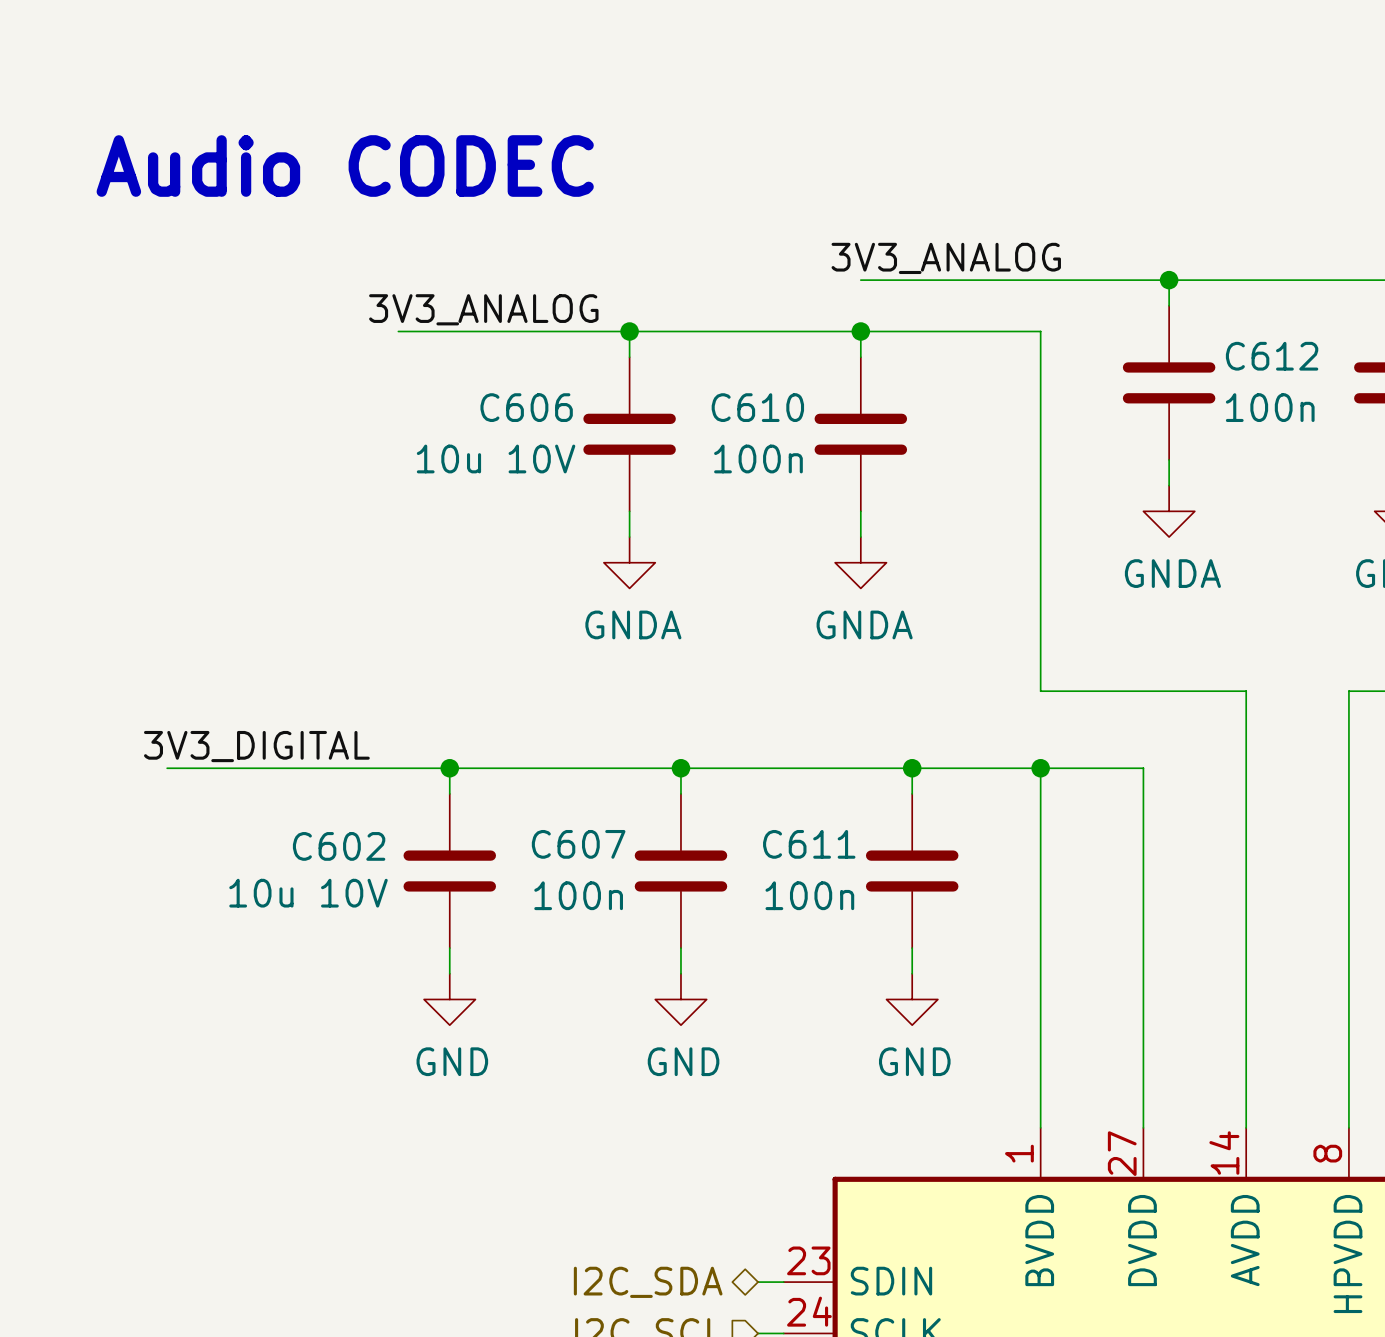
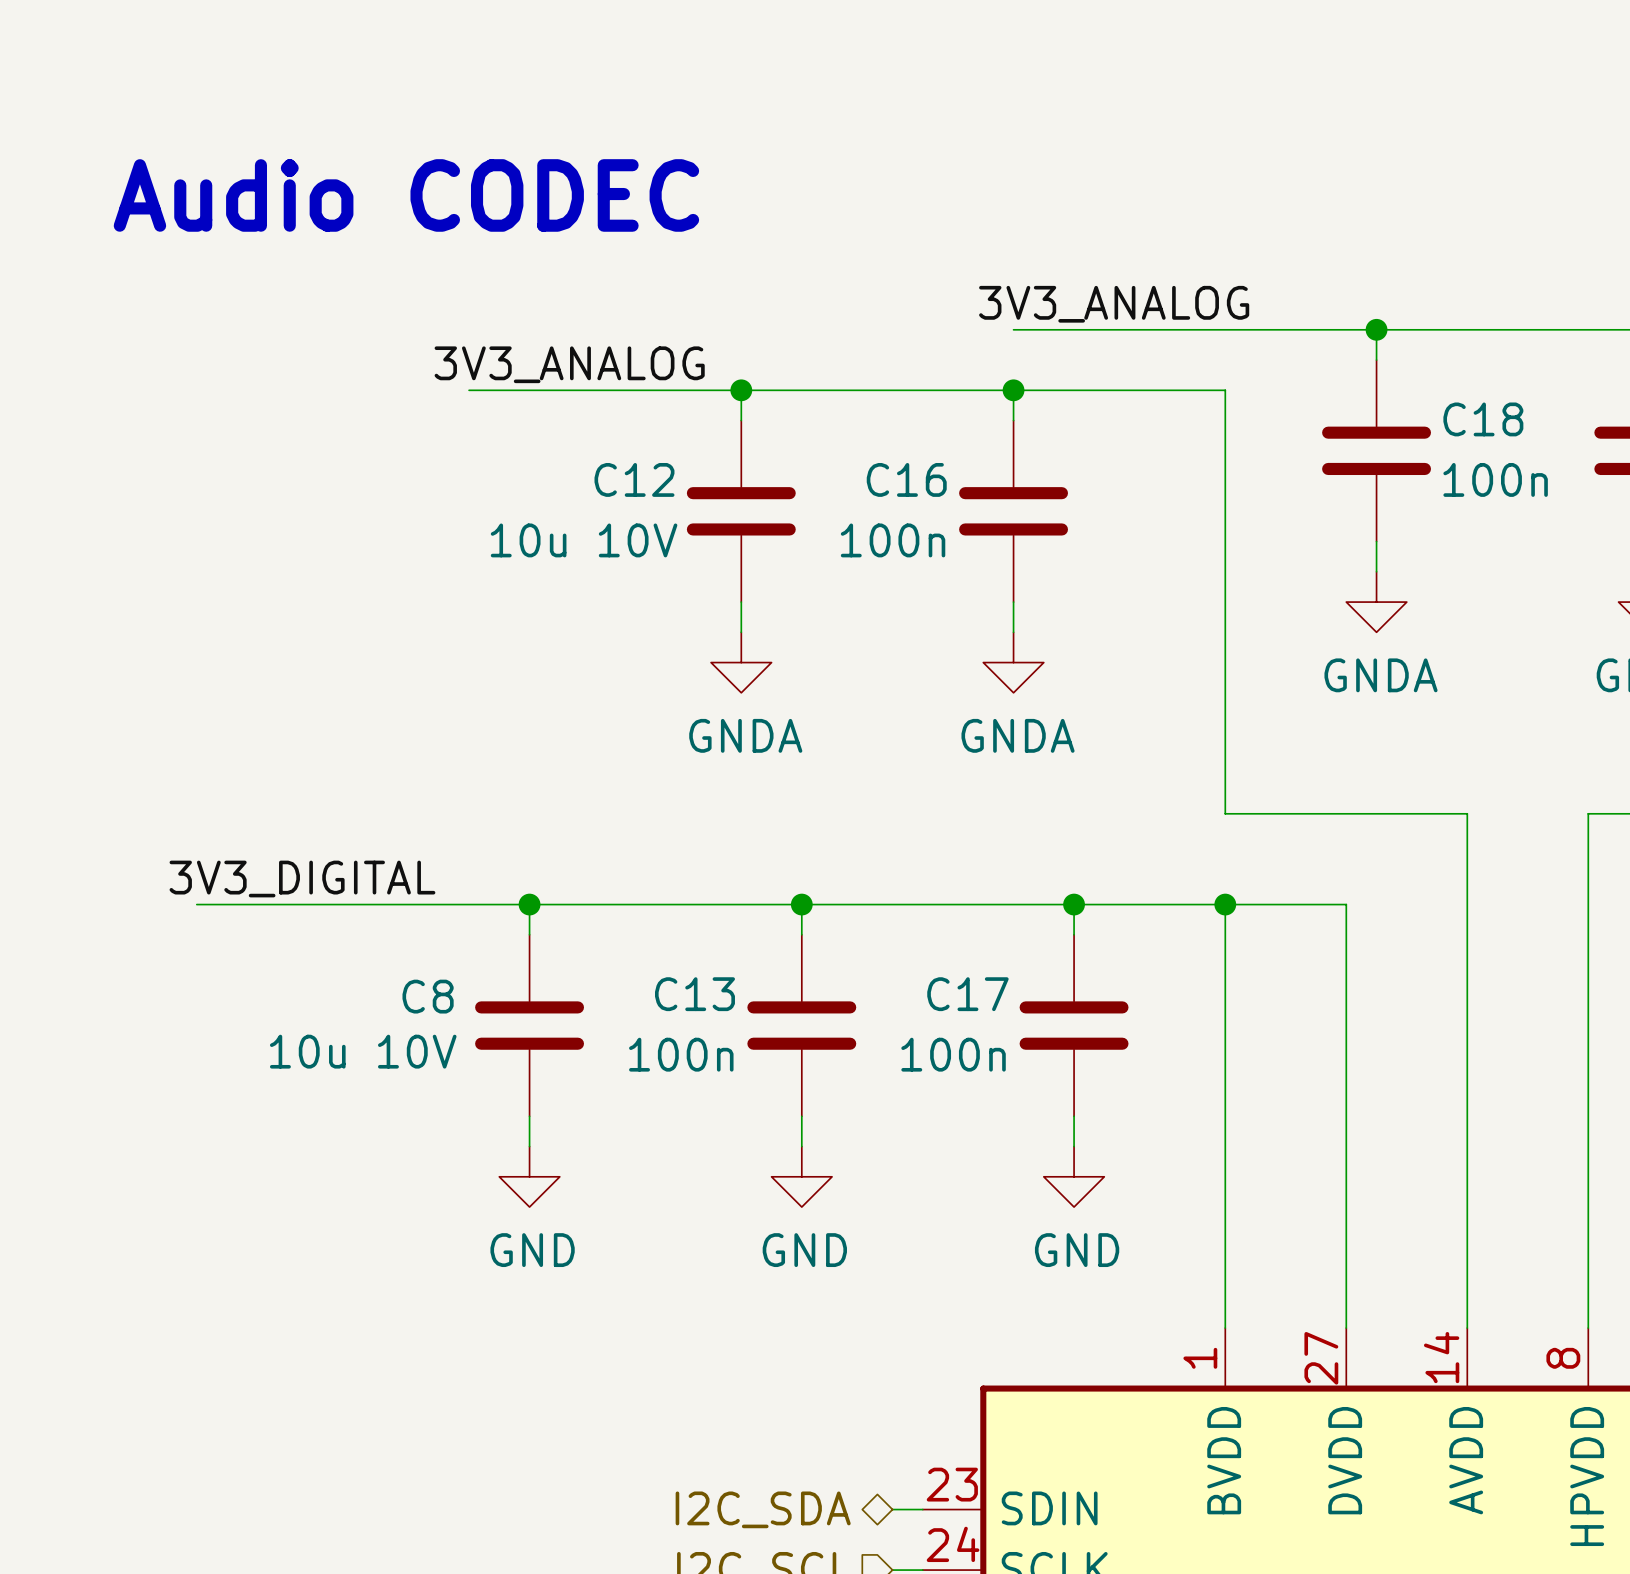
C612 name: C612 (1272, 356) -> C18 (1483, 419)
C606 name: C606 (526, 407) -> C12 (634, 479)
C610 name: C610 (757, 407) -> C16 (906, 479)
C607 name: C607 (578, 844) -> C13 (694, 994)
C611 name: C611 (809, 844) -> C17 (967, 994)
C602 name: C602 (339, 846) -> C8 (428, 996)

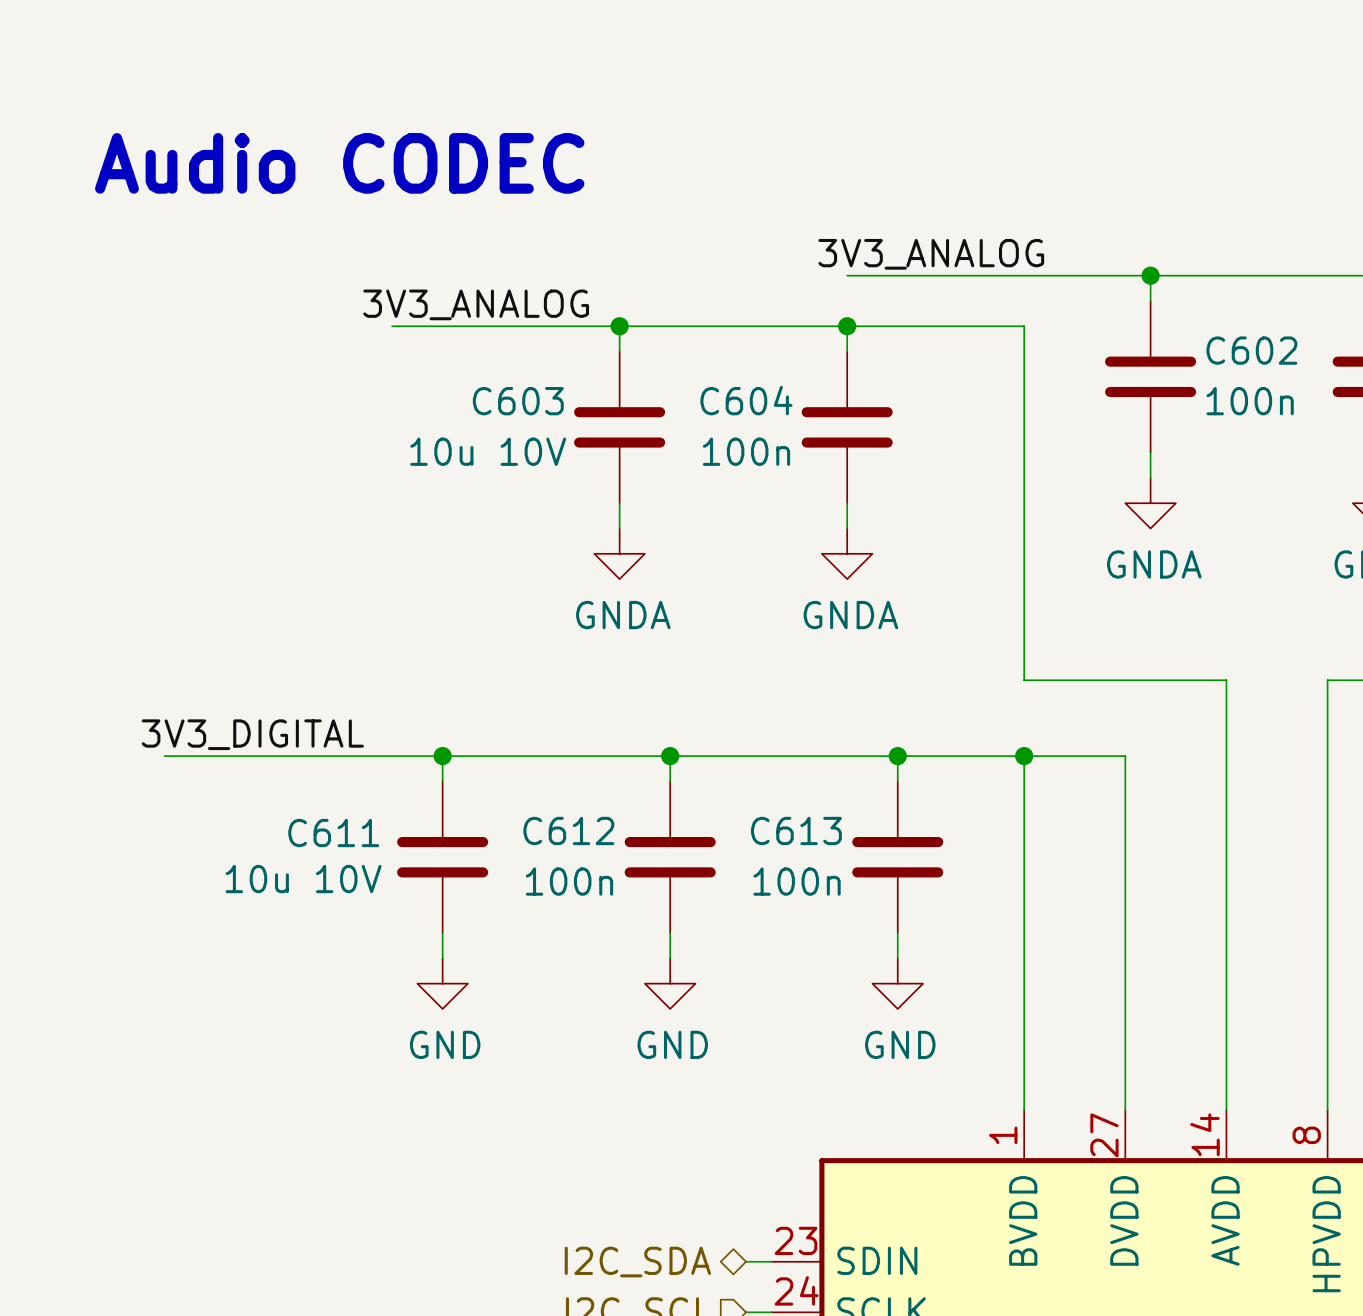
C18 name: C18 (1483, 419) -> C602 (1251, 350)
C12 name: C12 (634, 479) -> C603 (518, 401)
C16 name: C16 (906, 479) -> C604 (746, 400)
C13 name: C13 (694, 994) -> C612 (568, 830)
C17 name: C17 (967, 994) -> C613 (796, 830)
C8 name: C8 (428, 996) -> C611 (333, 833)

